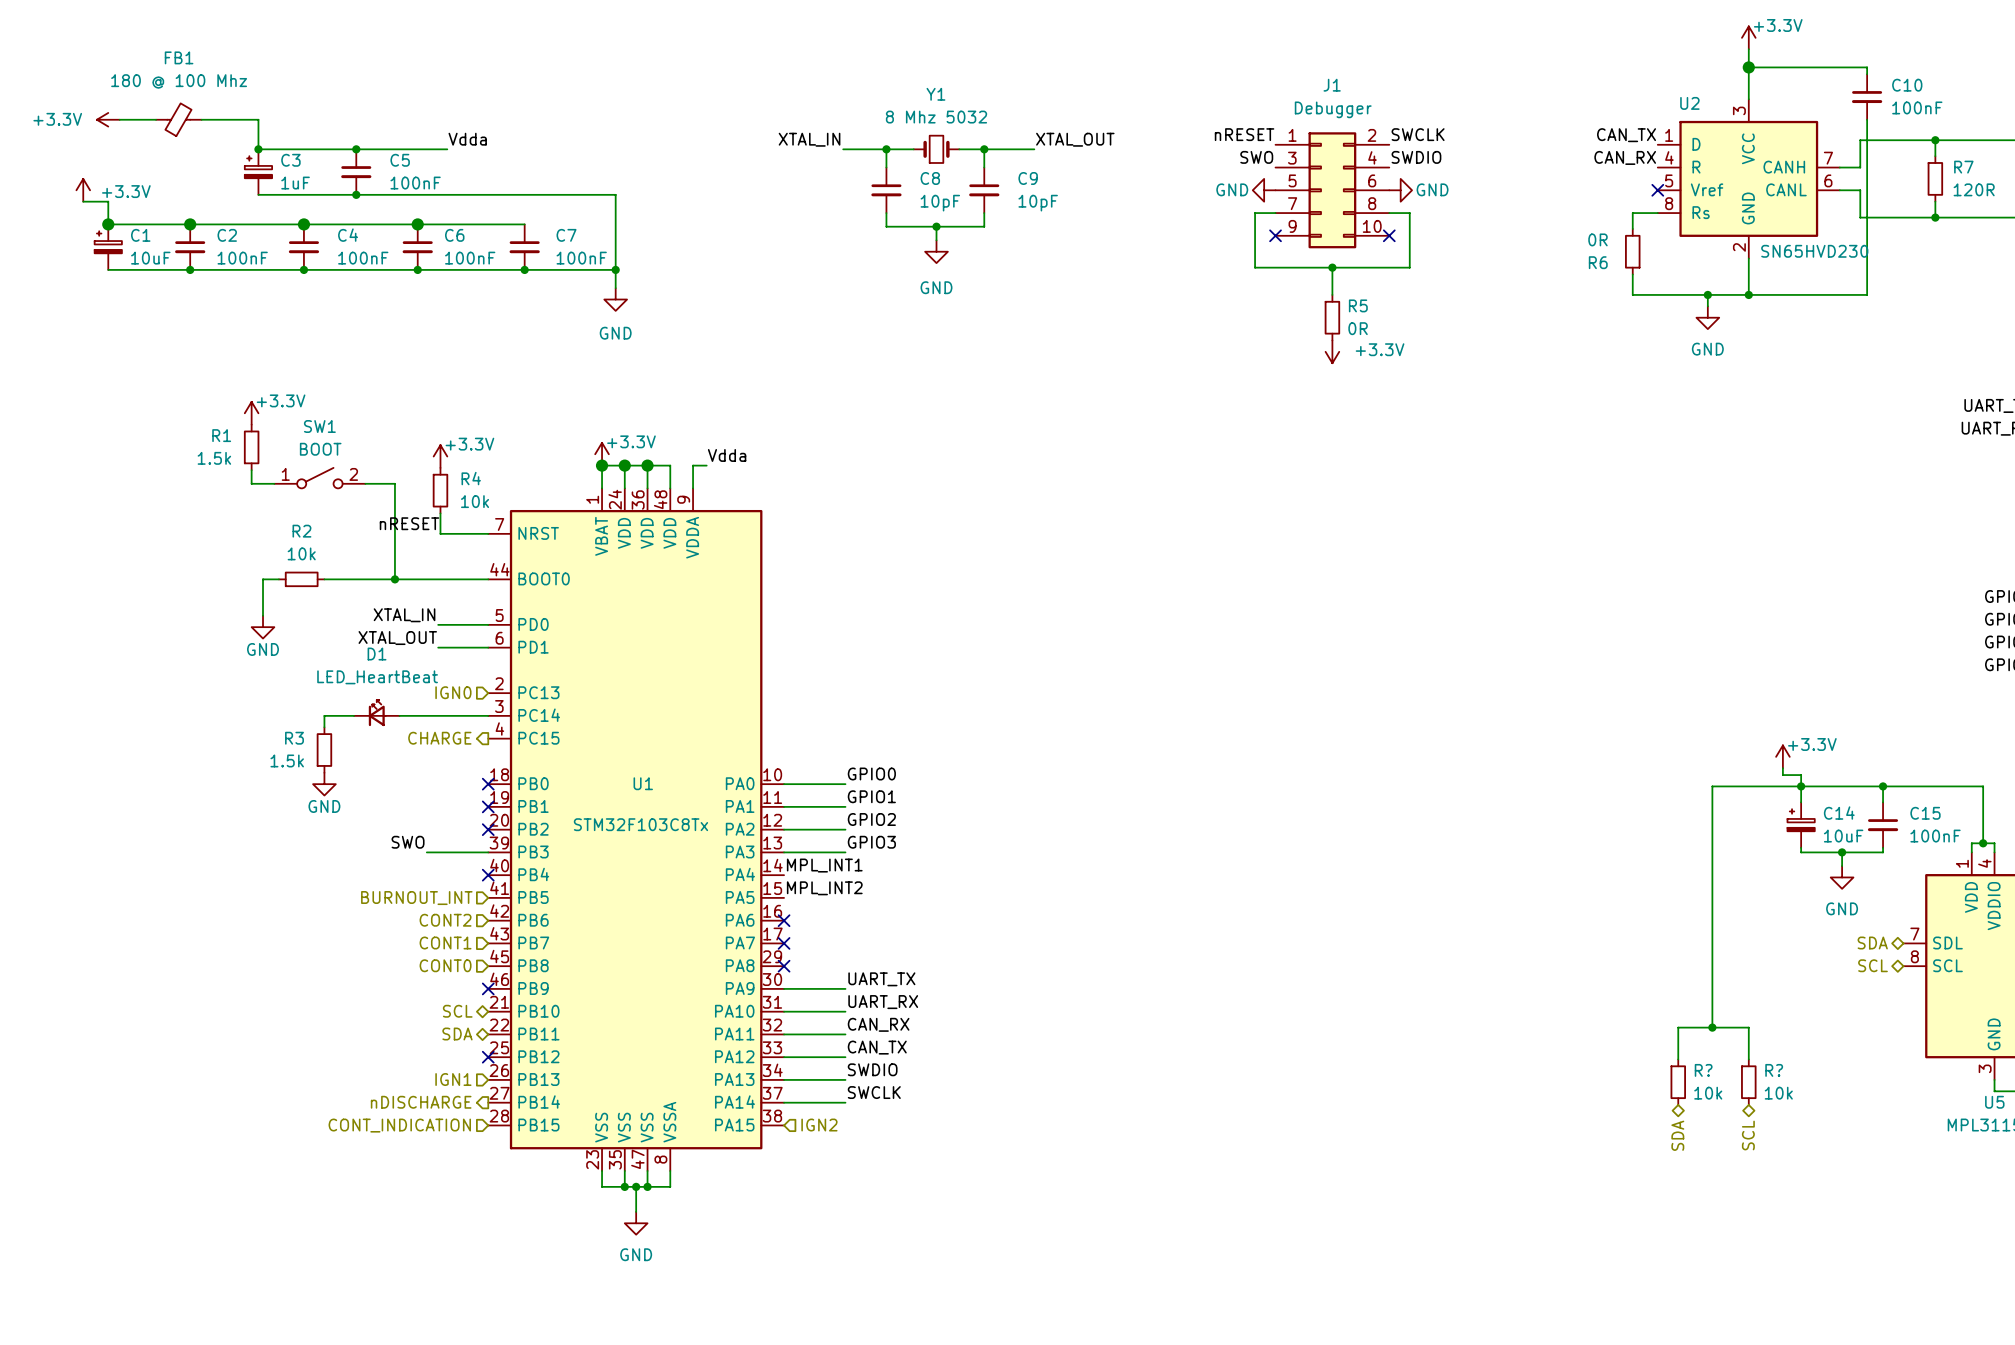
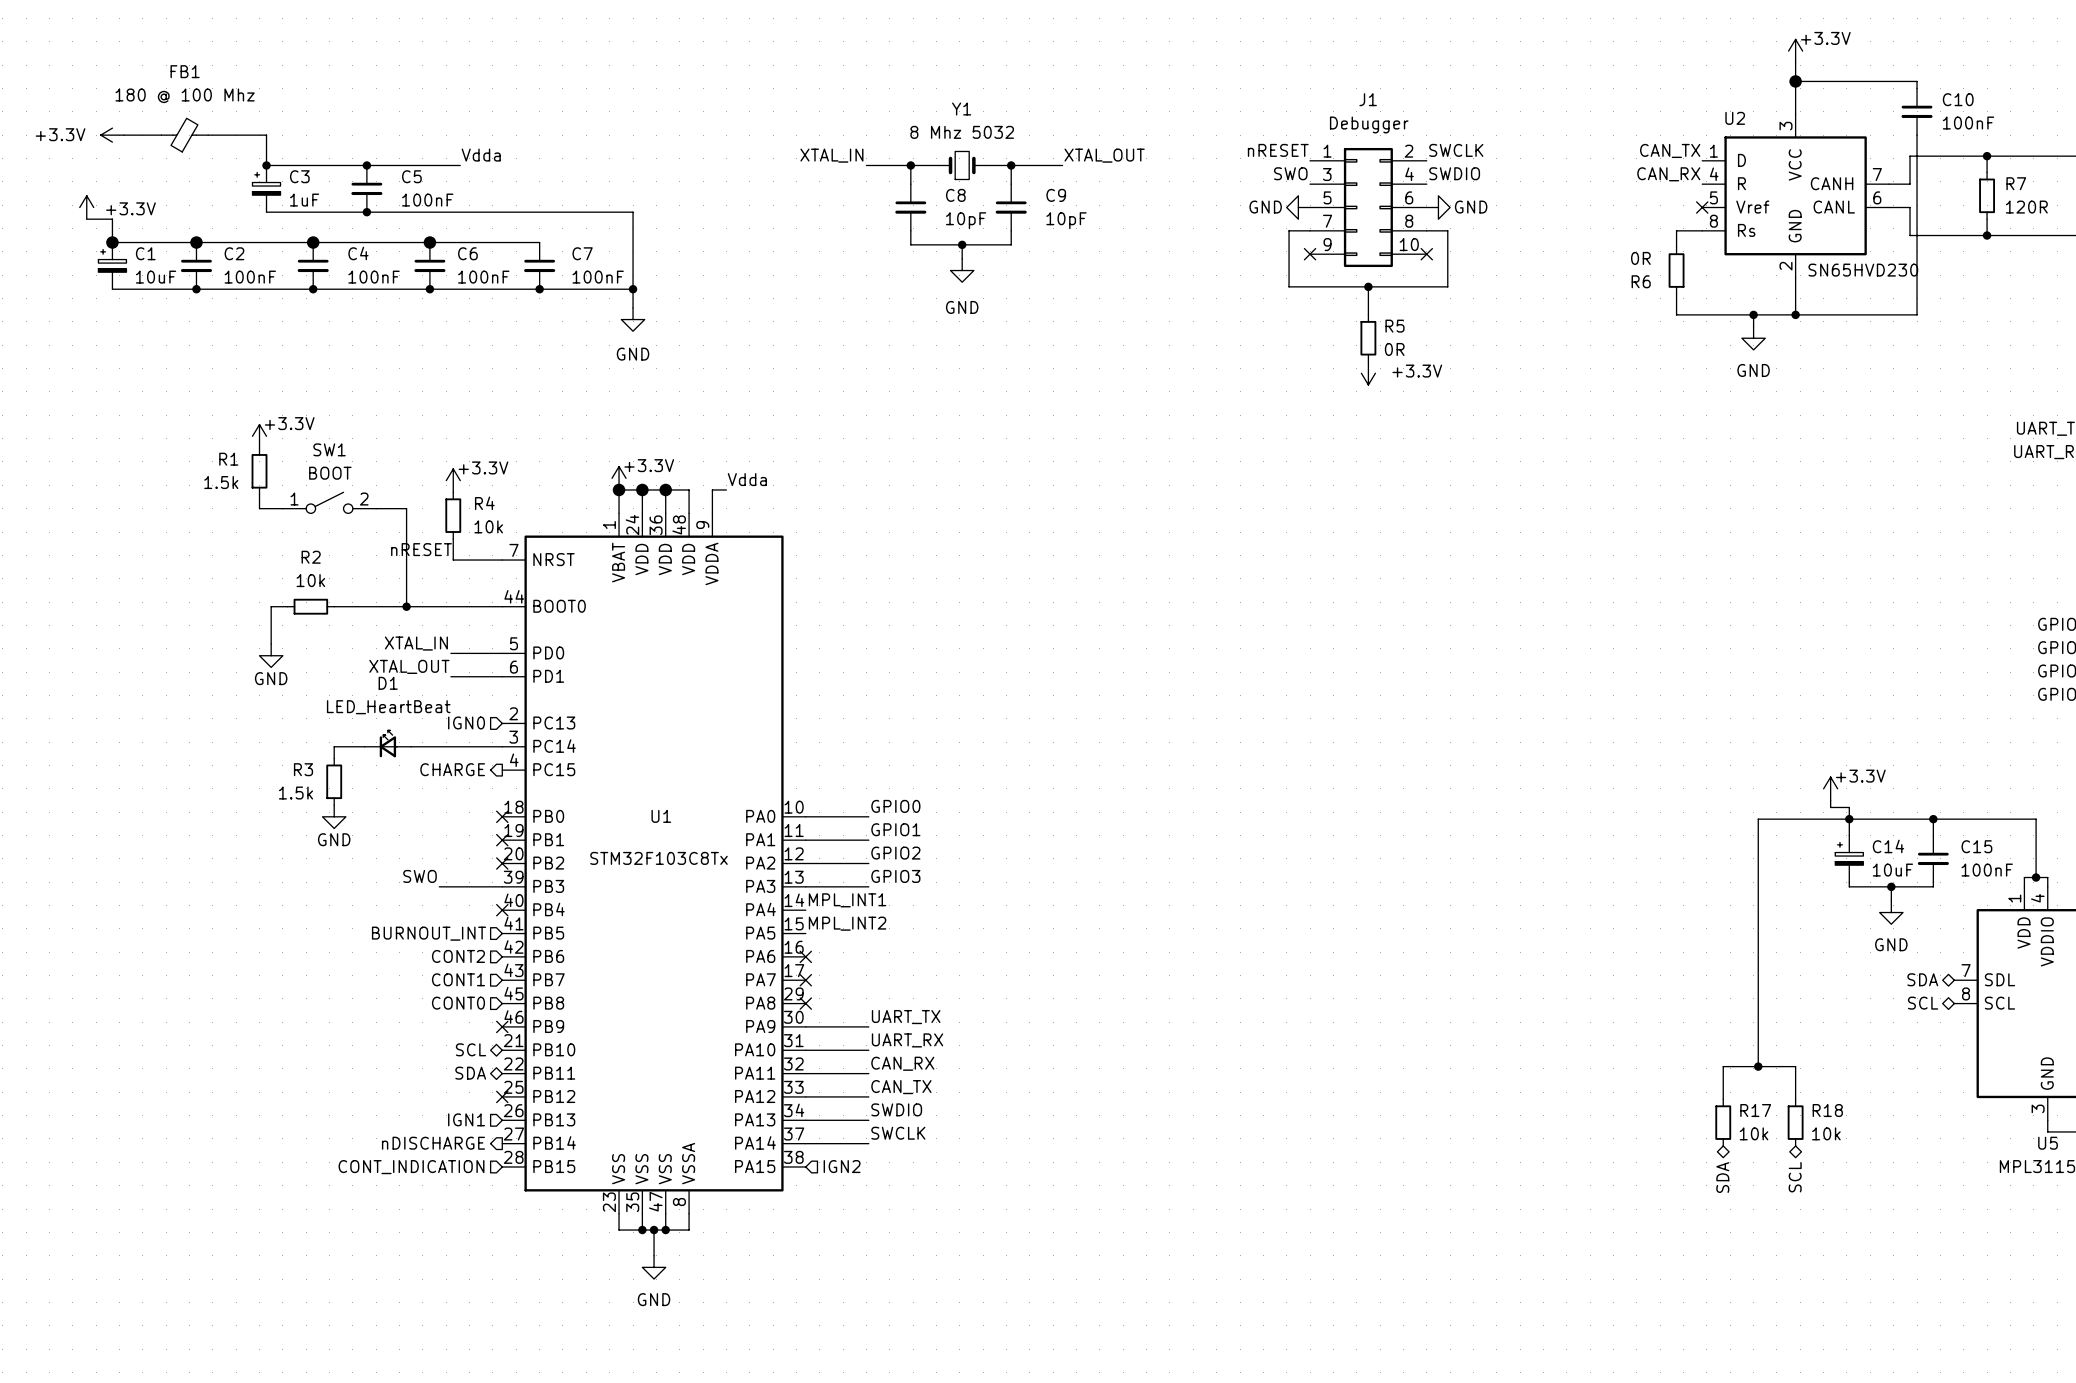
R? name: R? (1703, 1070) -> R17 (1755, 1110)
R? name: R? (1774, 1070) -> R18 (1827, 1110)

